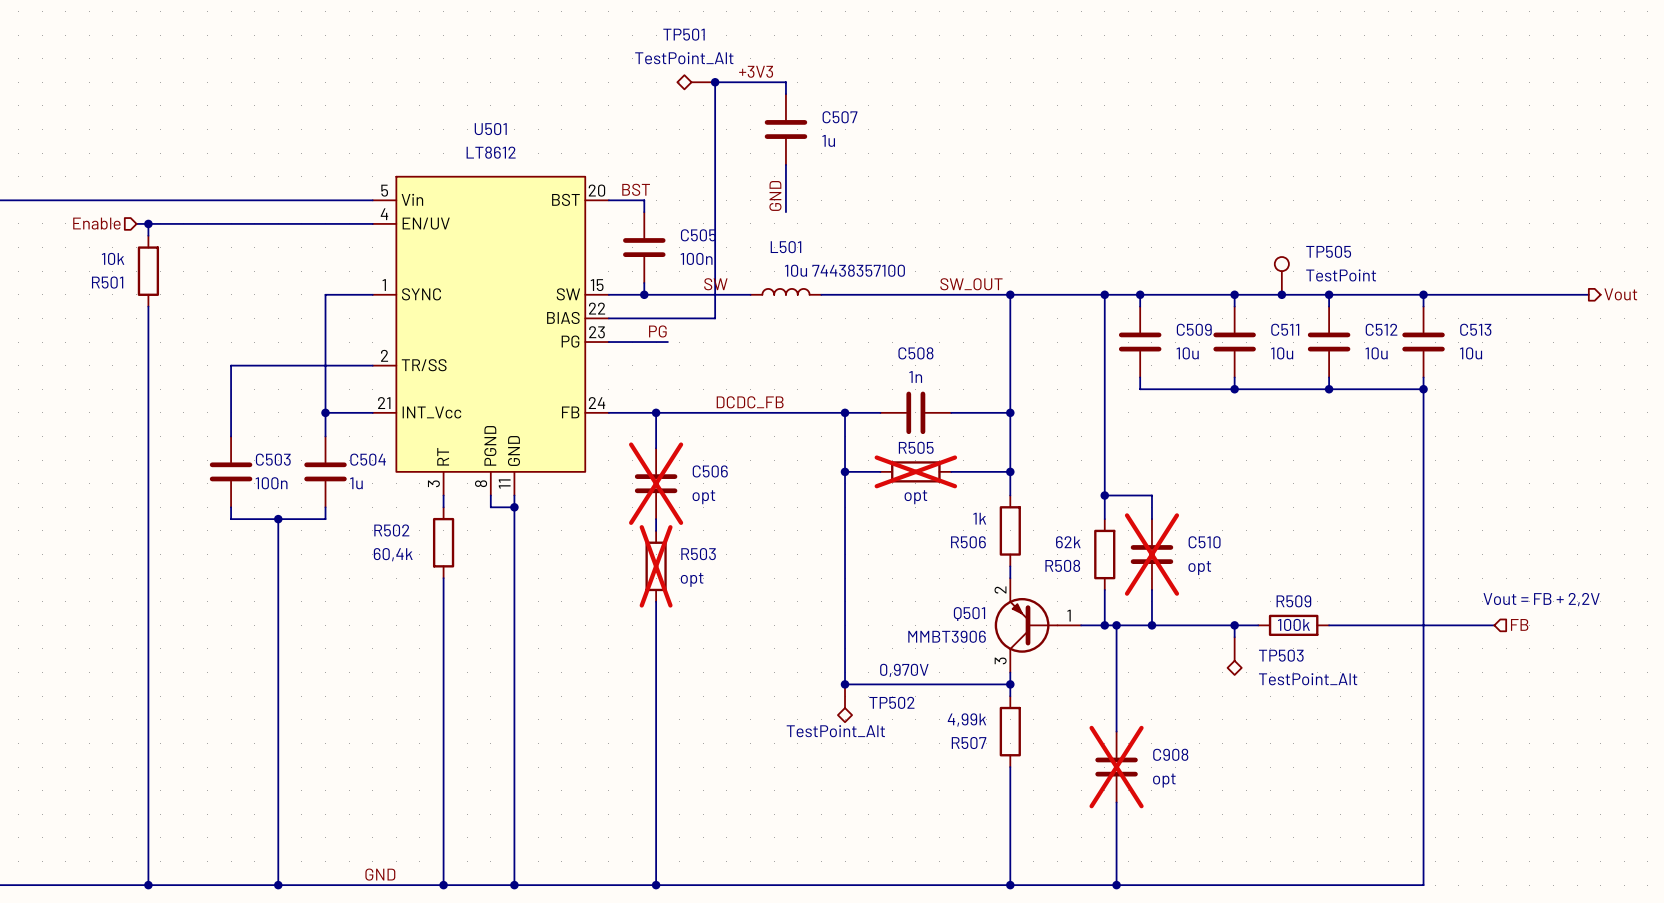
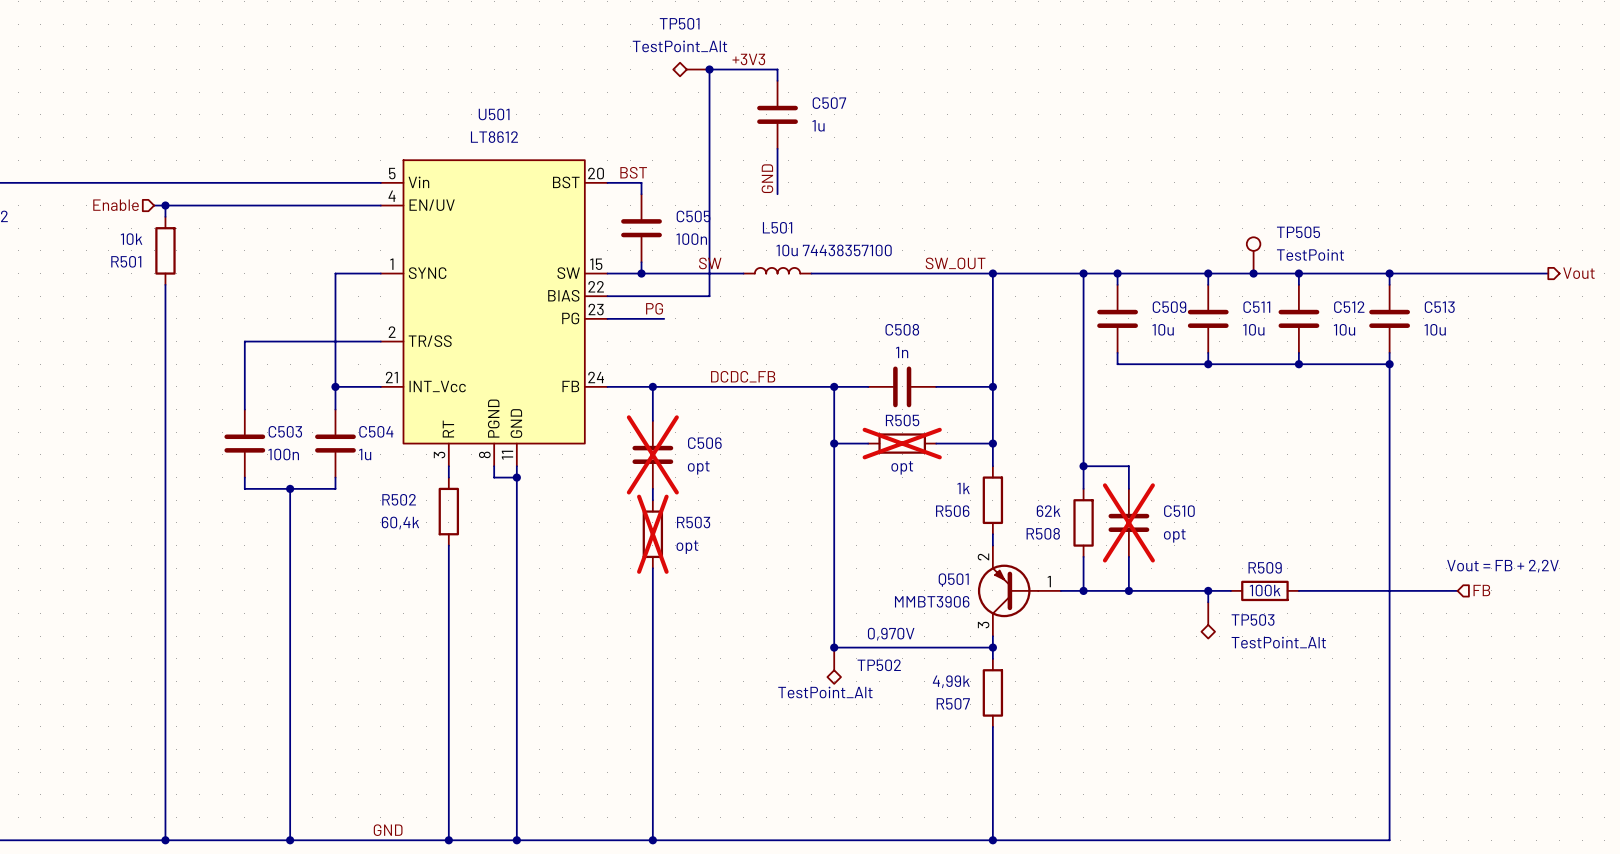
wire: (1116, 625) (1116, 731) -> none
junction: (1116, 625) -> none
C908: opt (1116, 767) -> none
wire: (1116, 802) (1116, 885) -> none
junction: (1116, 885) -> none

